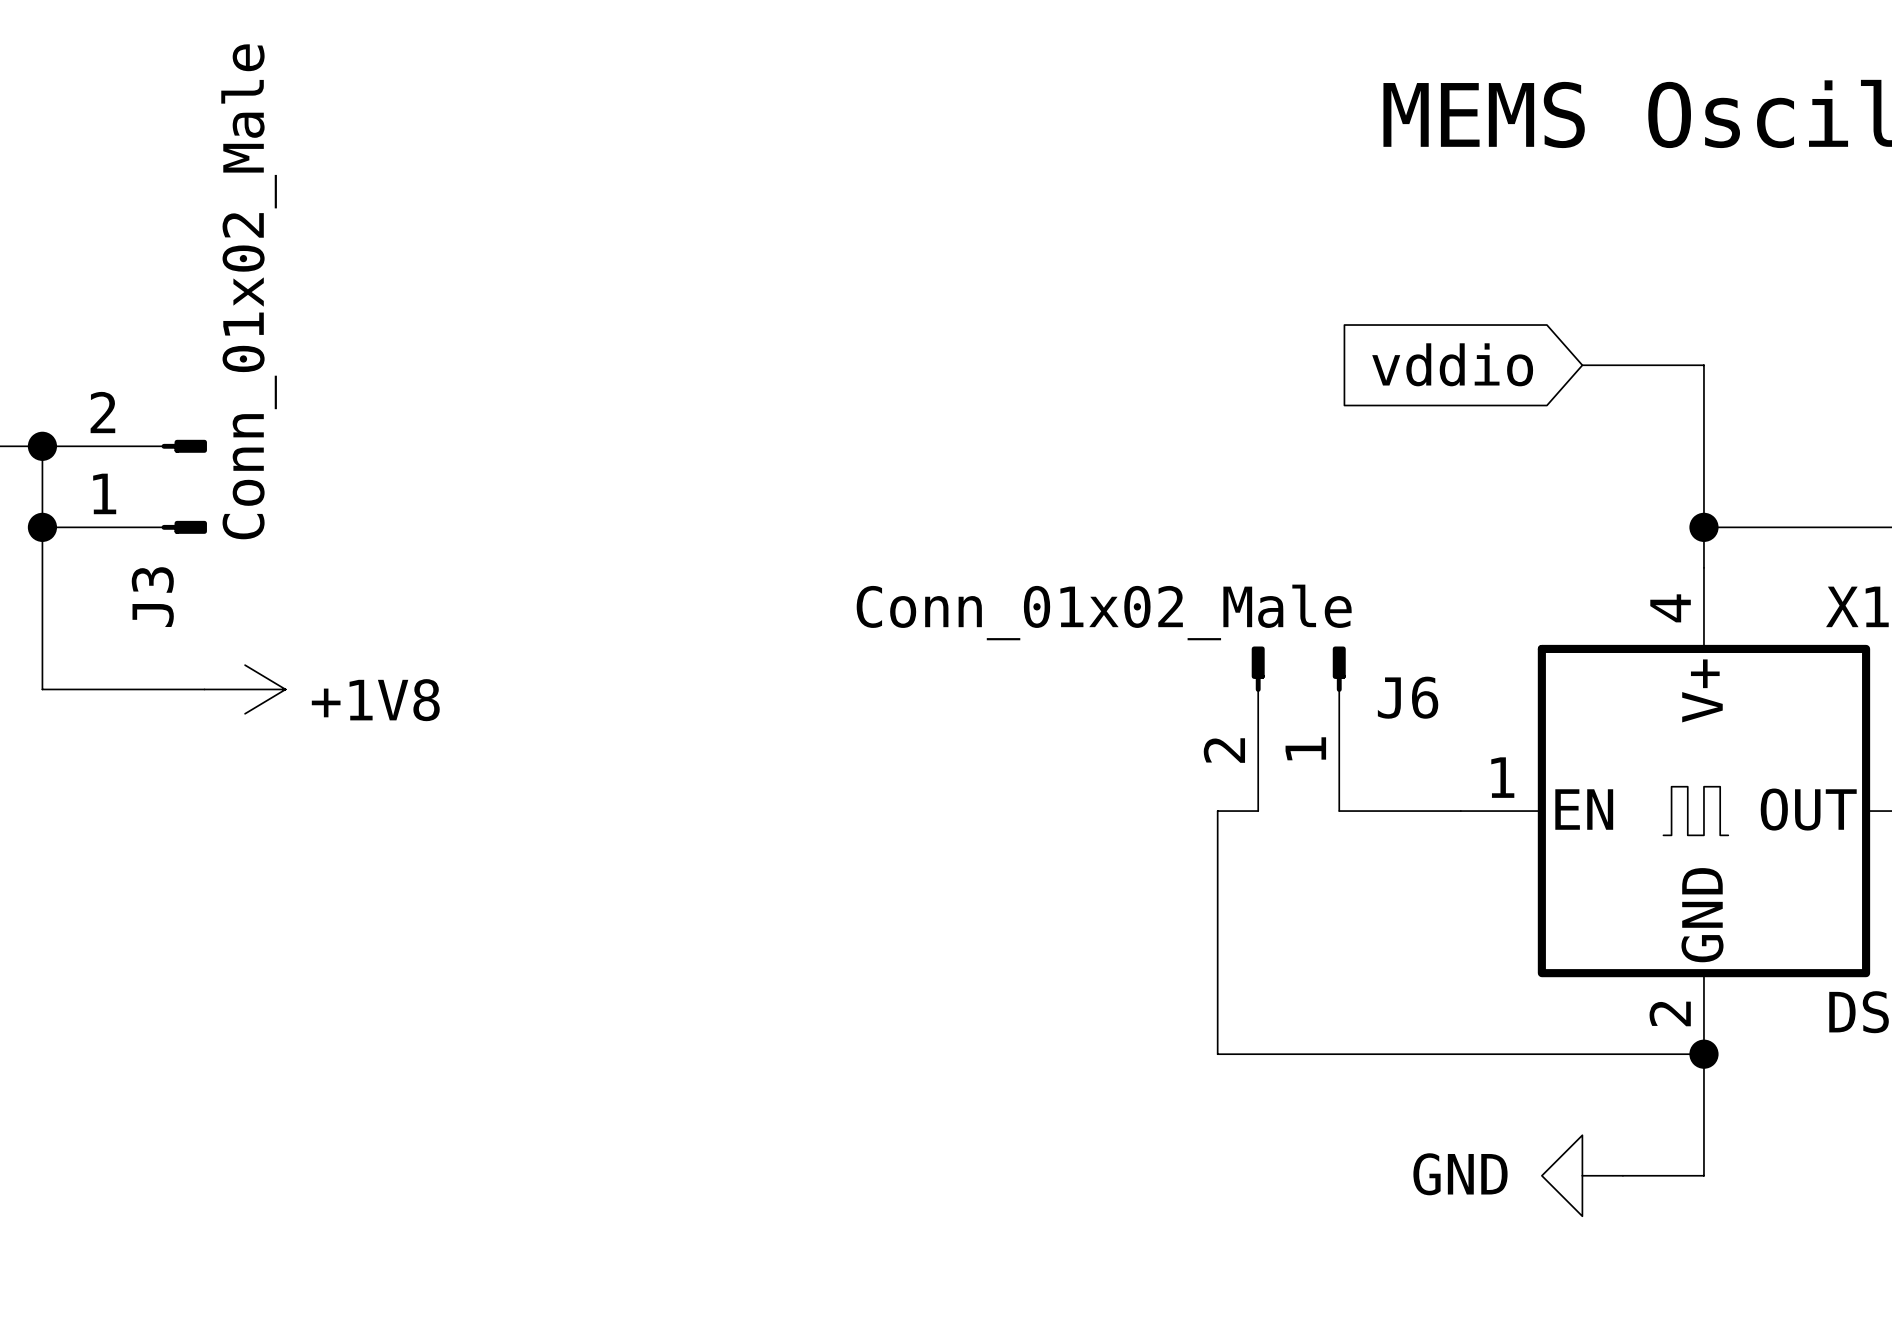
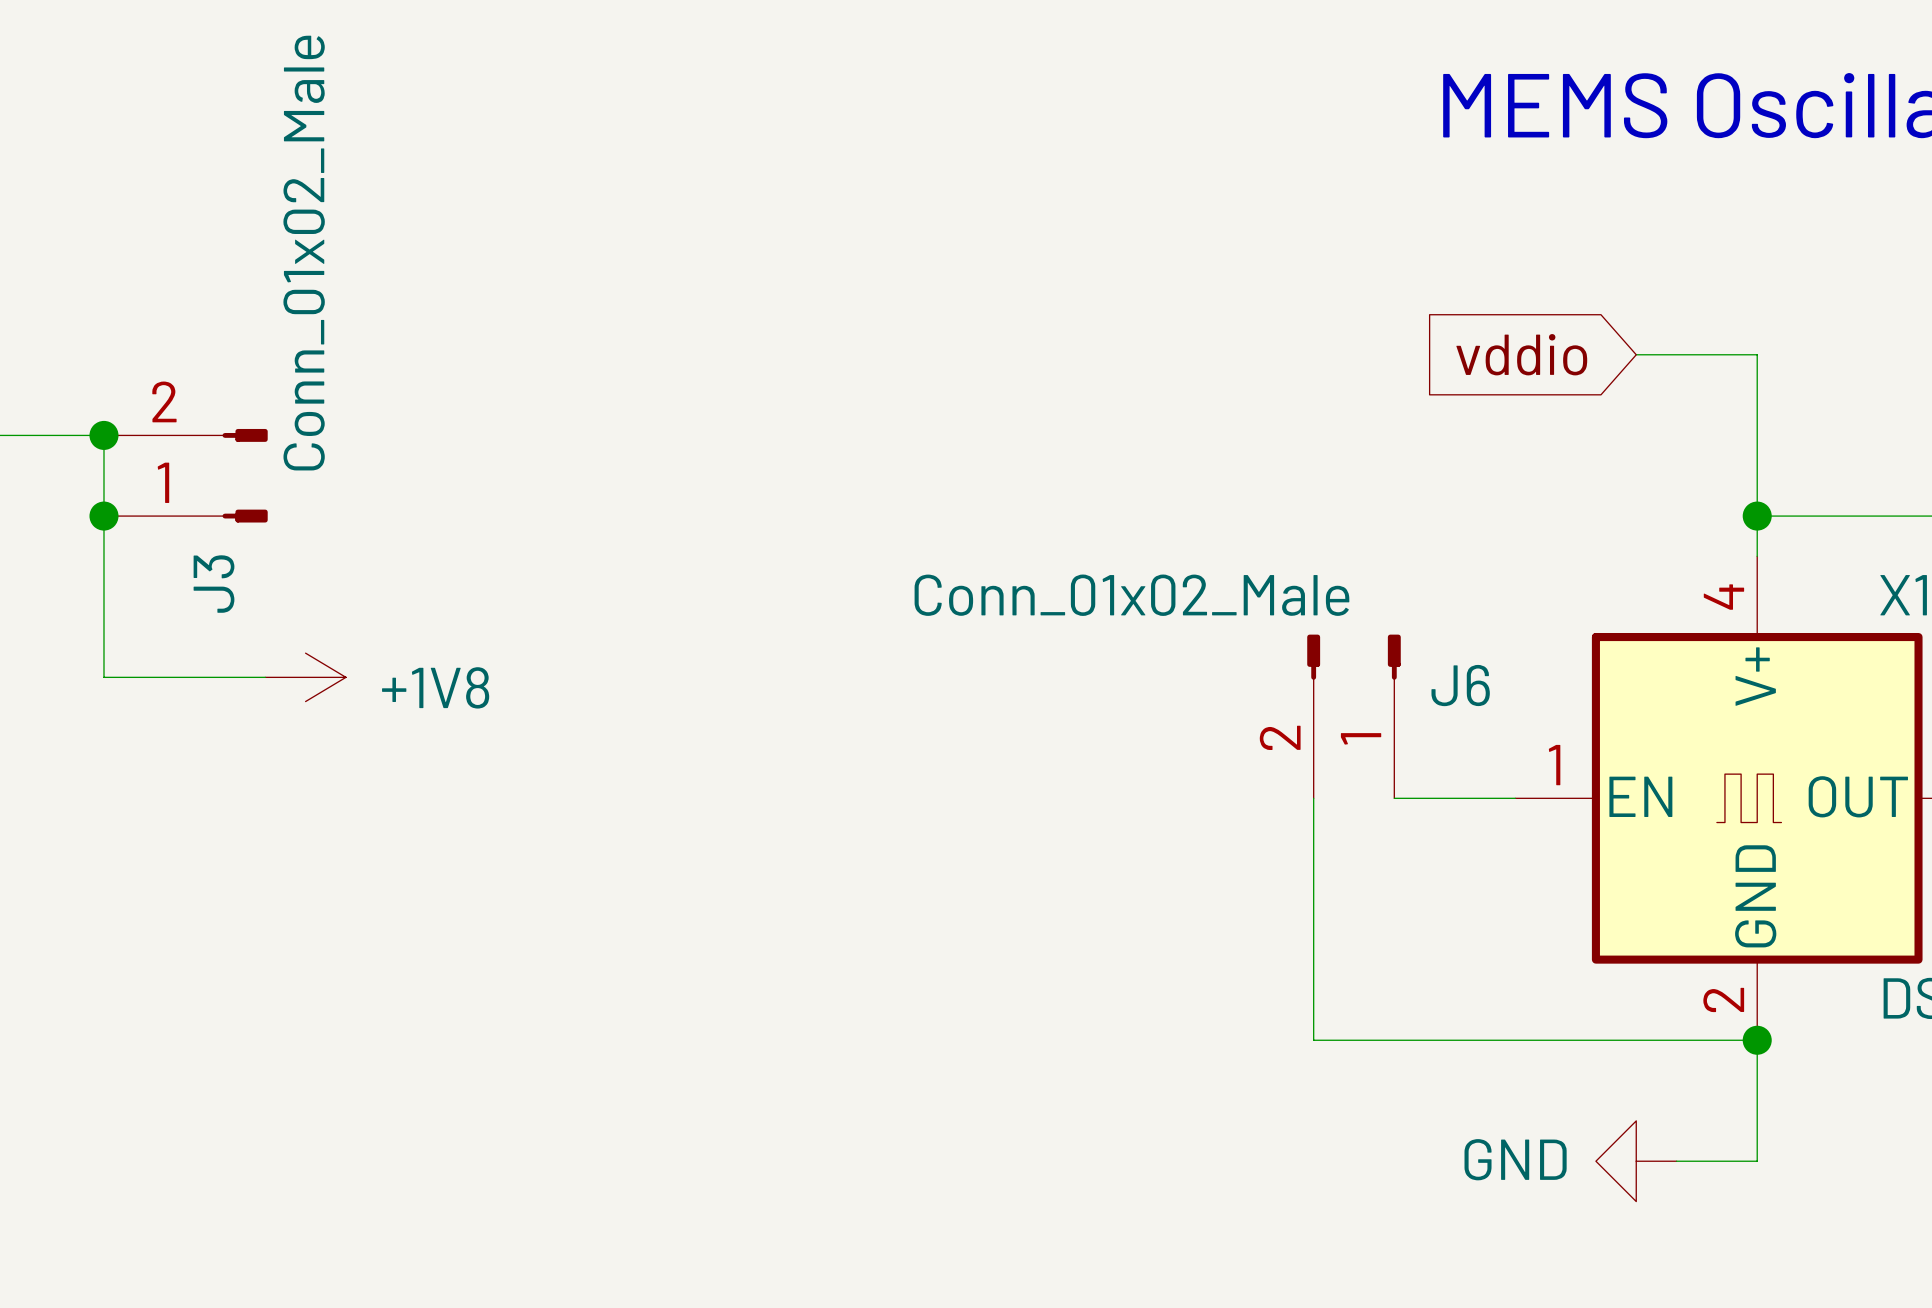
wire: (1258, 811) (1217, 811) (1217, 1054) (1258, 1054) -> (1313, 798) (1313, 1040)

